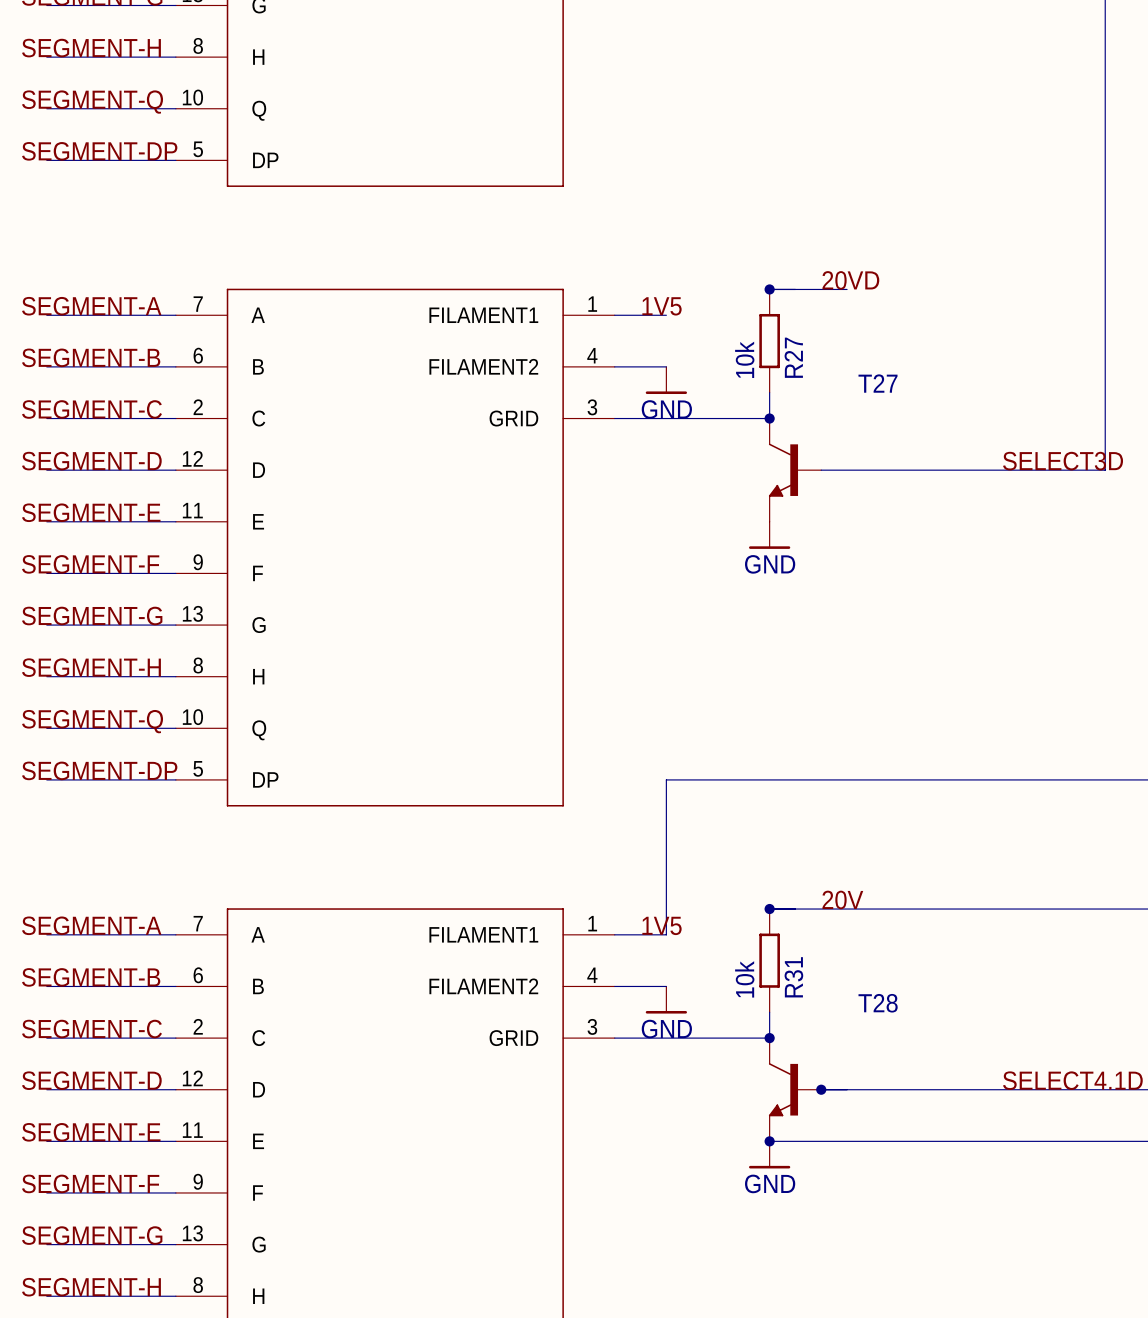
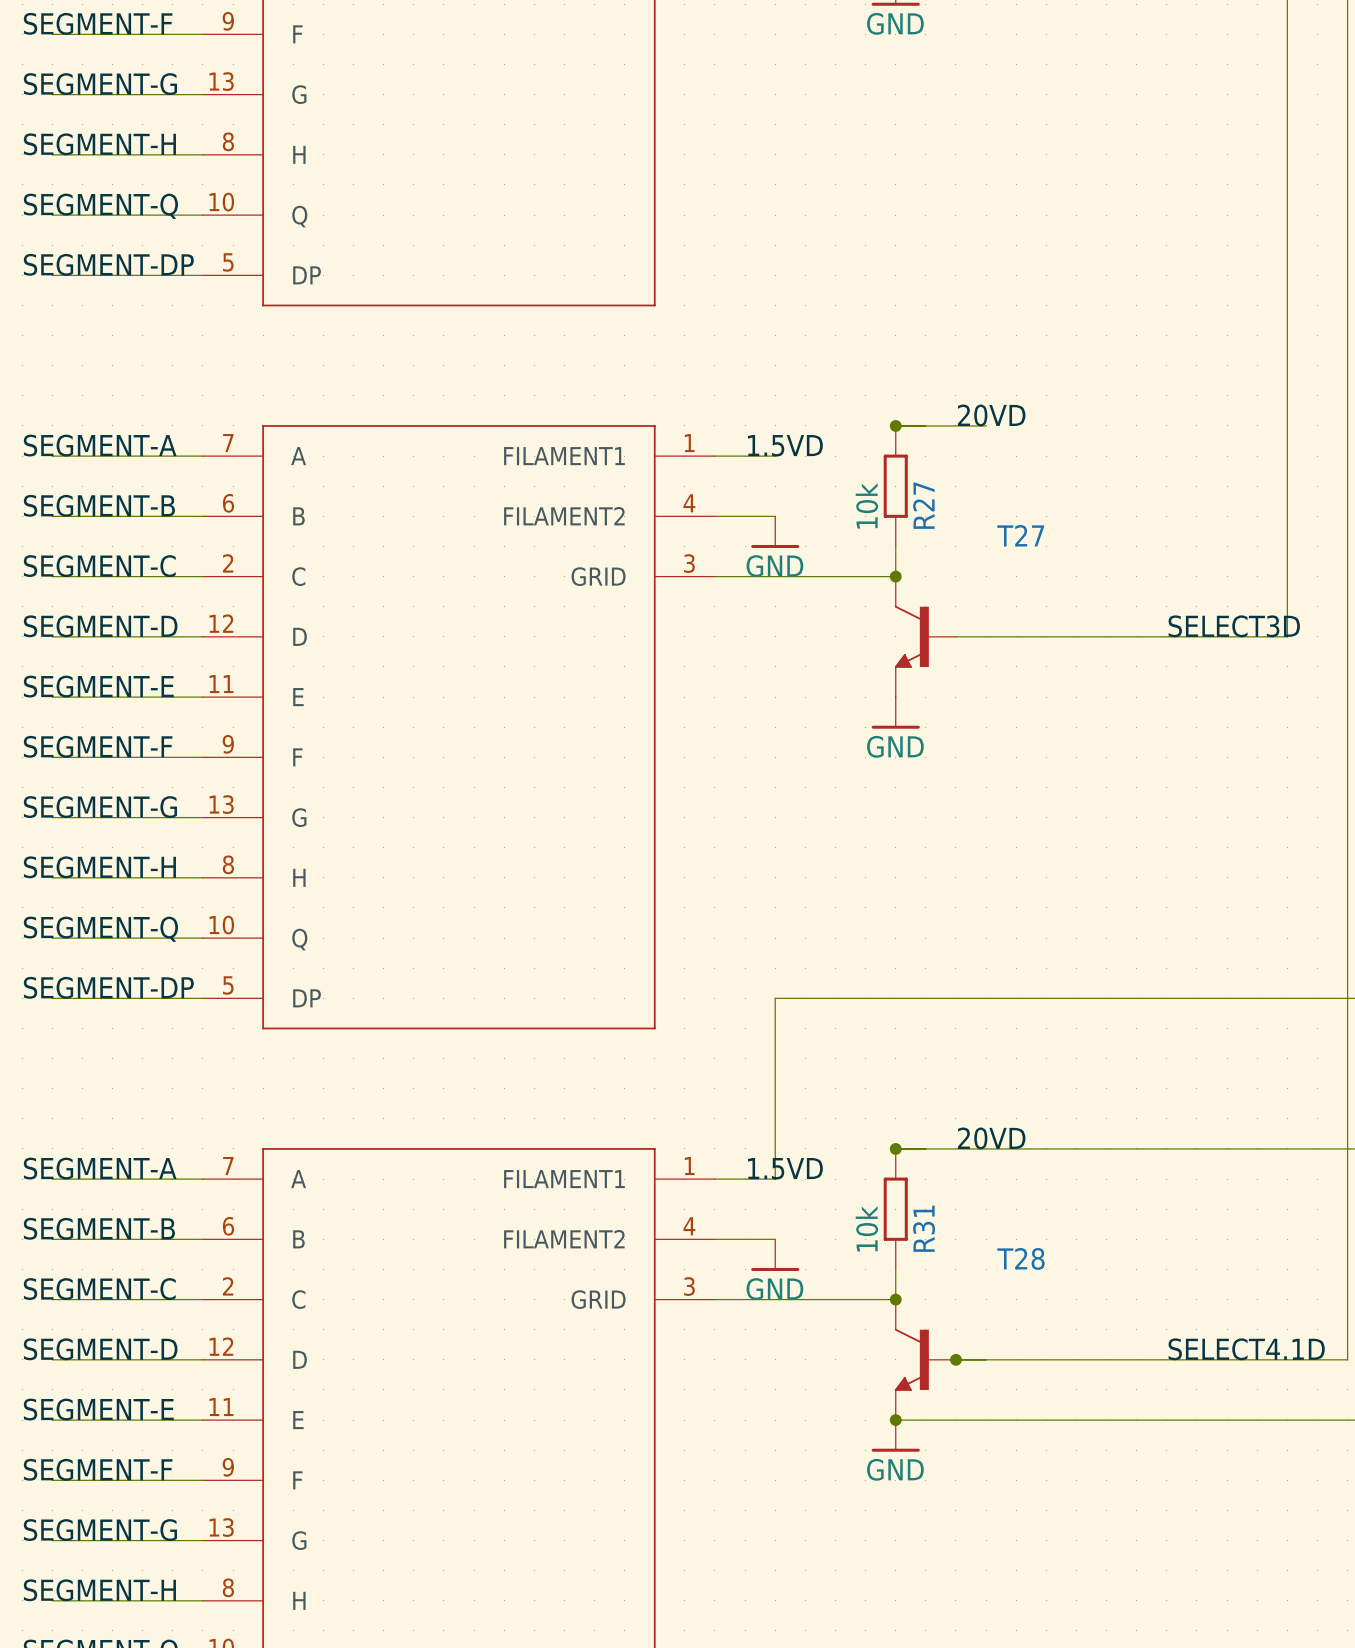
label: 1V5 (662, 306) -> 1.5VD (785, 445)
label: 20V (842, 899) -> 20VD (991, 1138)
label: 1V5 (662, 925) -> 1.5VD (785, 1168)

